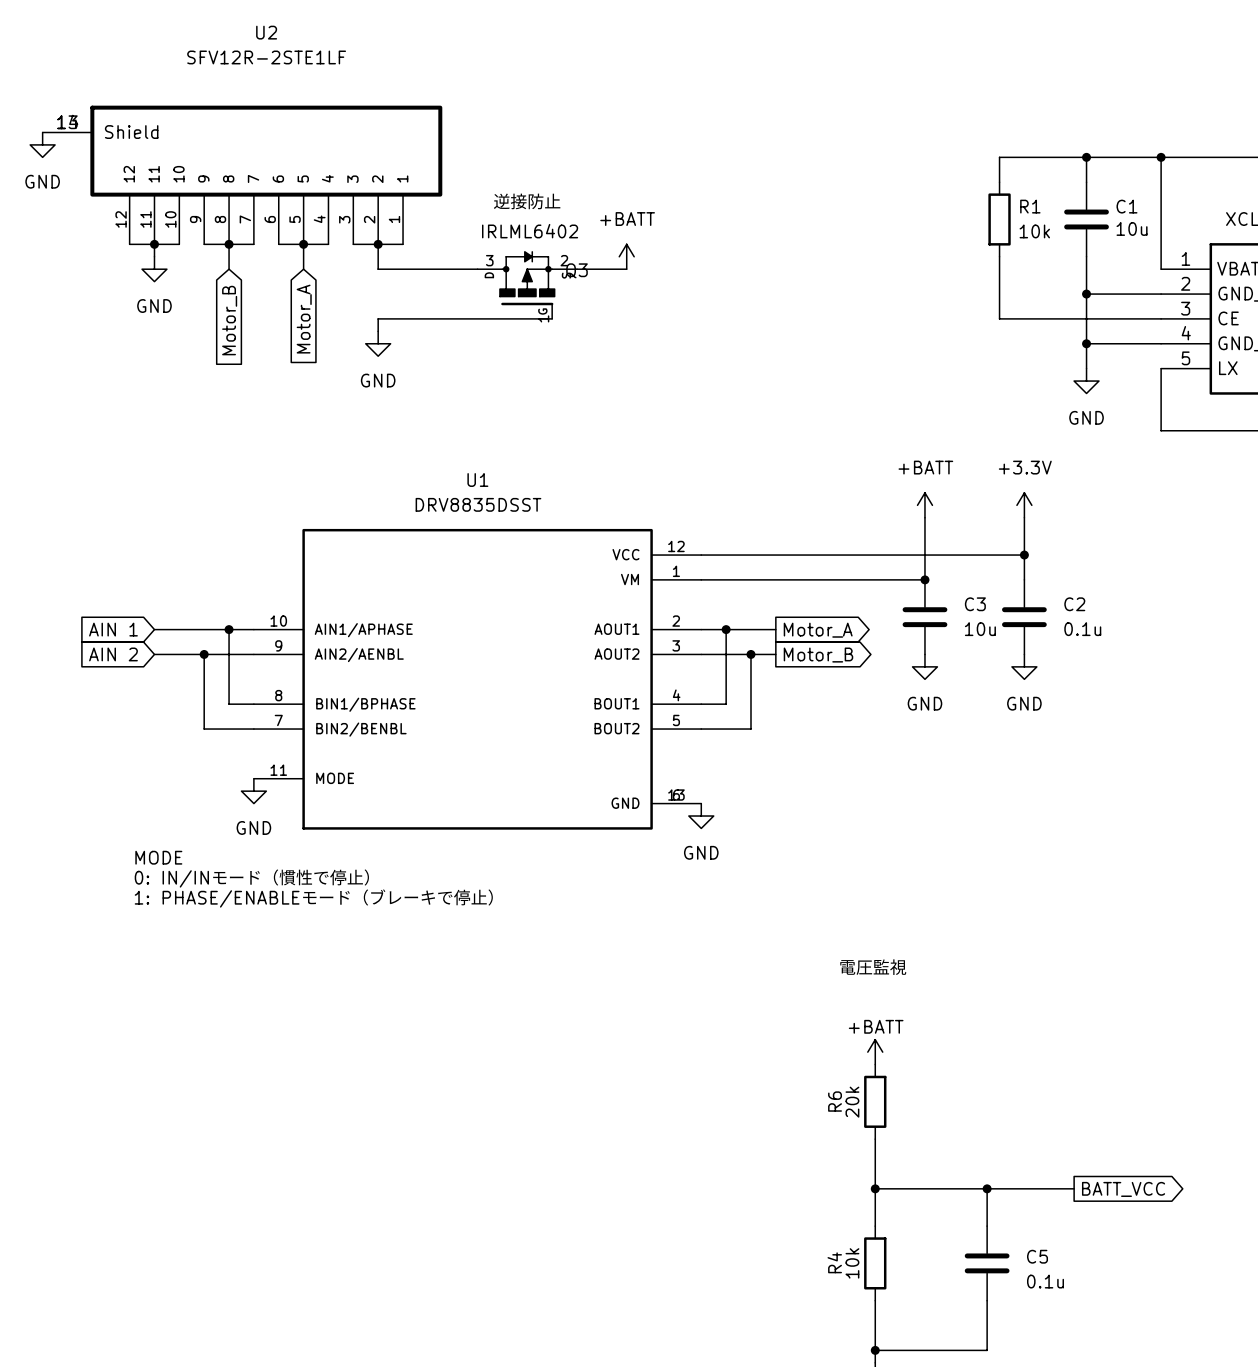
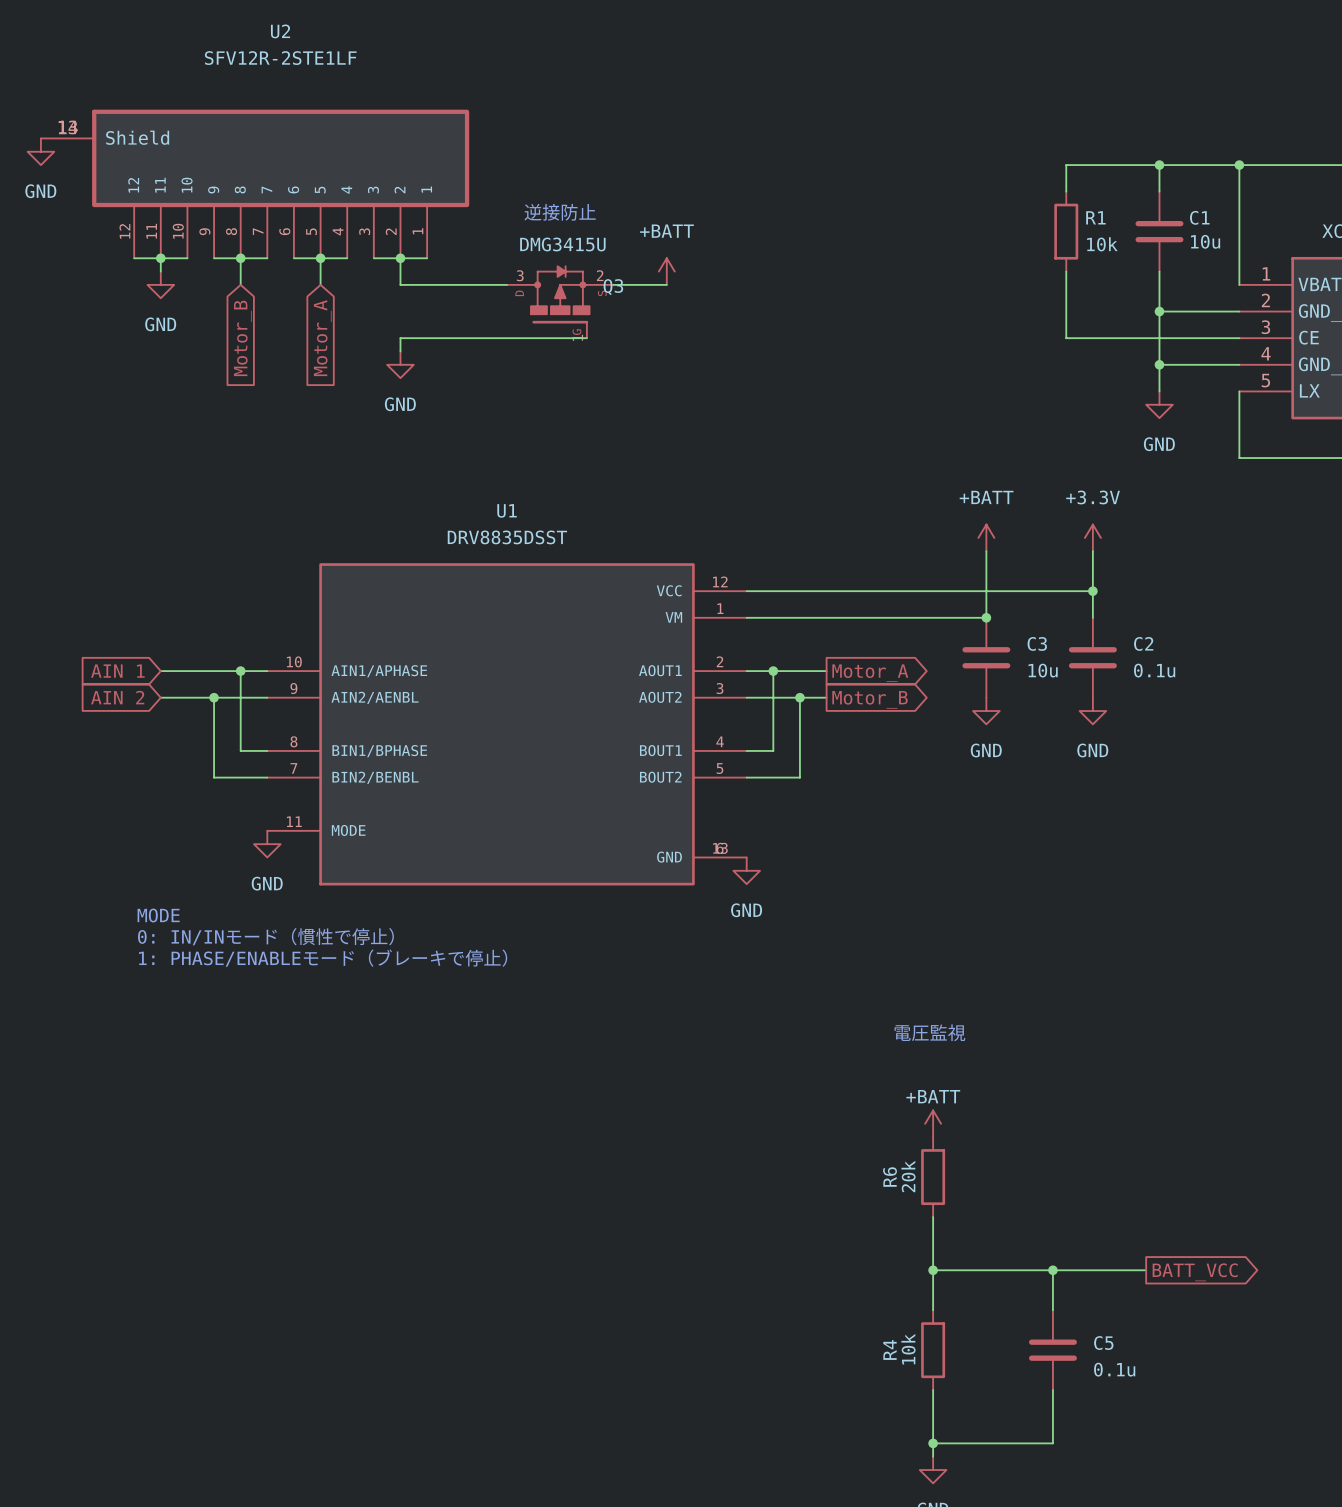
Q3 value: IRLML6402 (530, 231) -> DMG3415U (562, 244)

